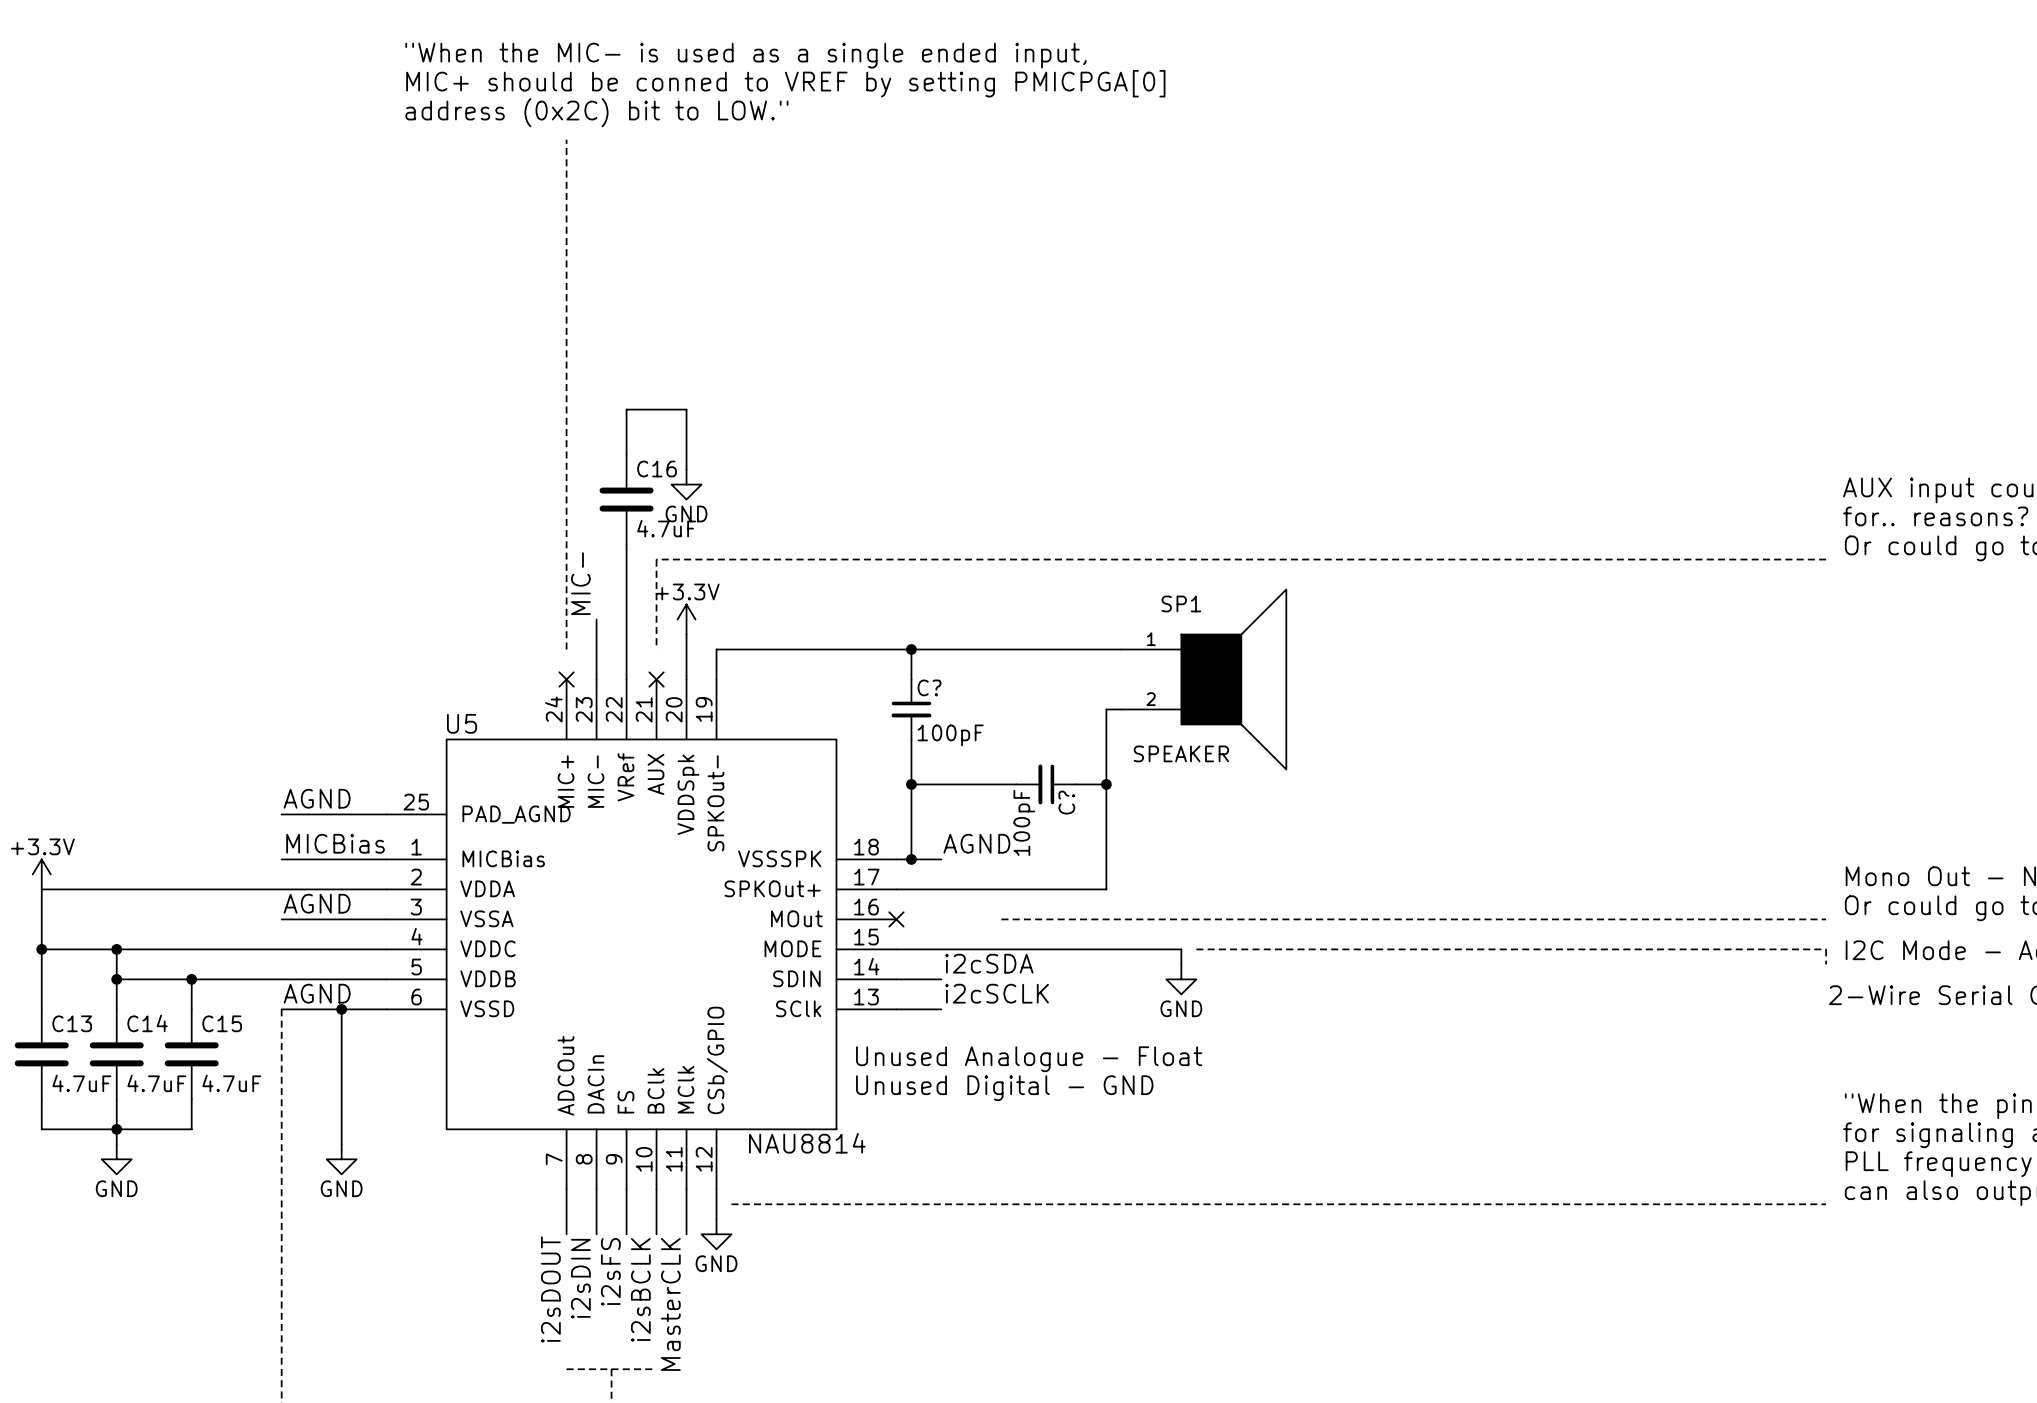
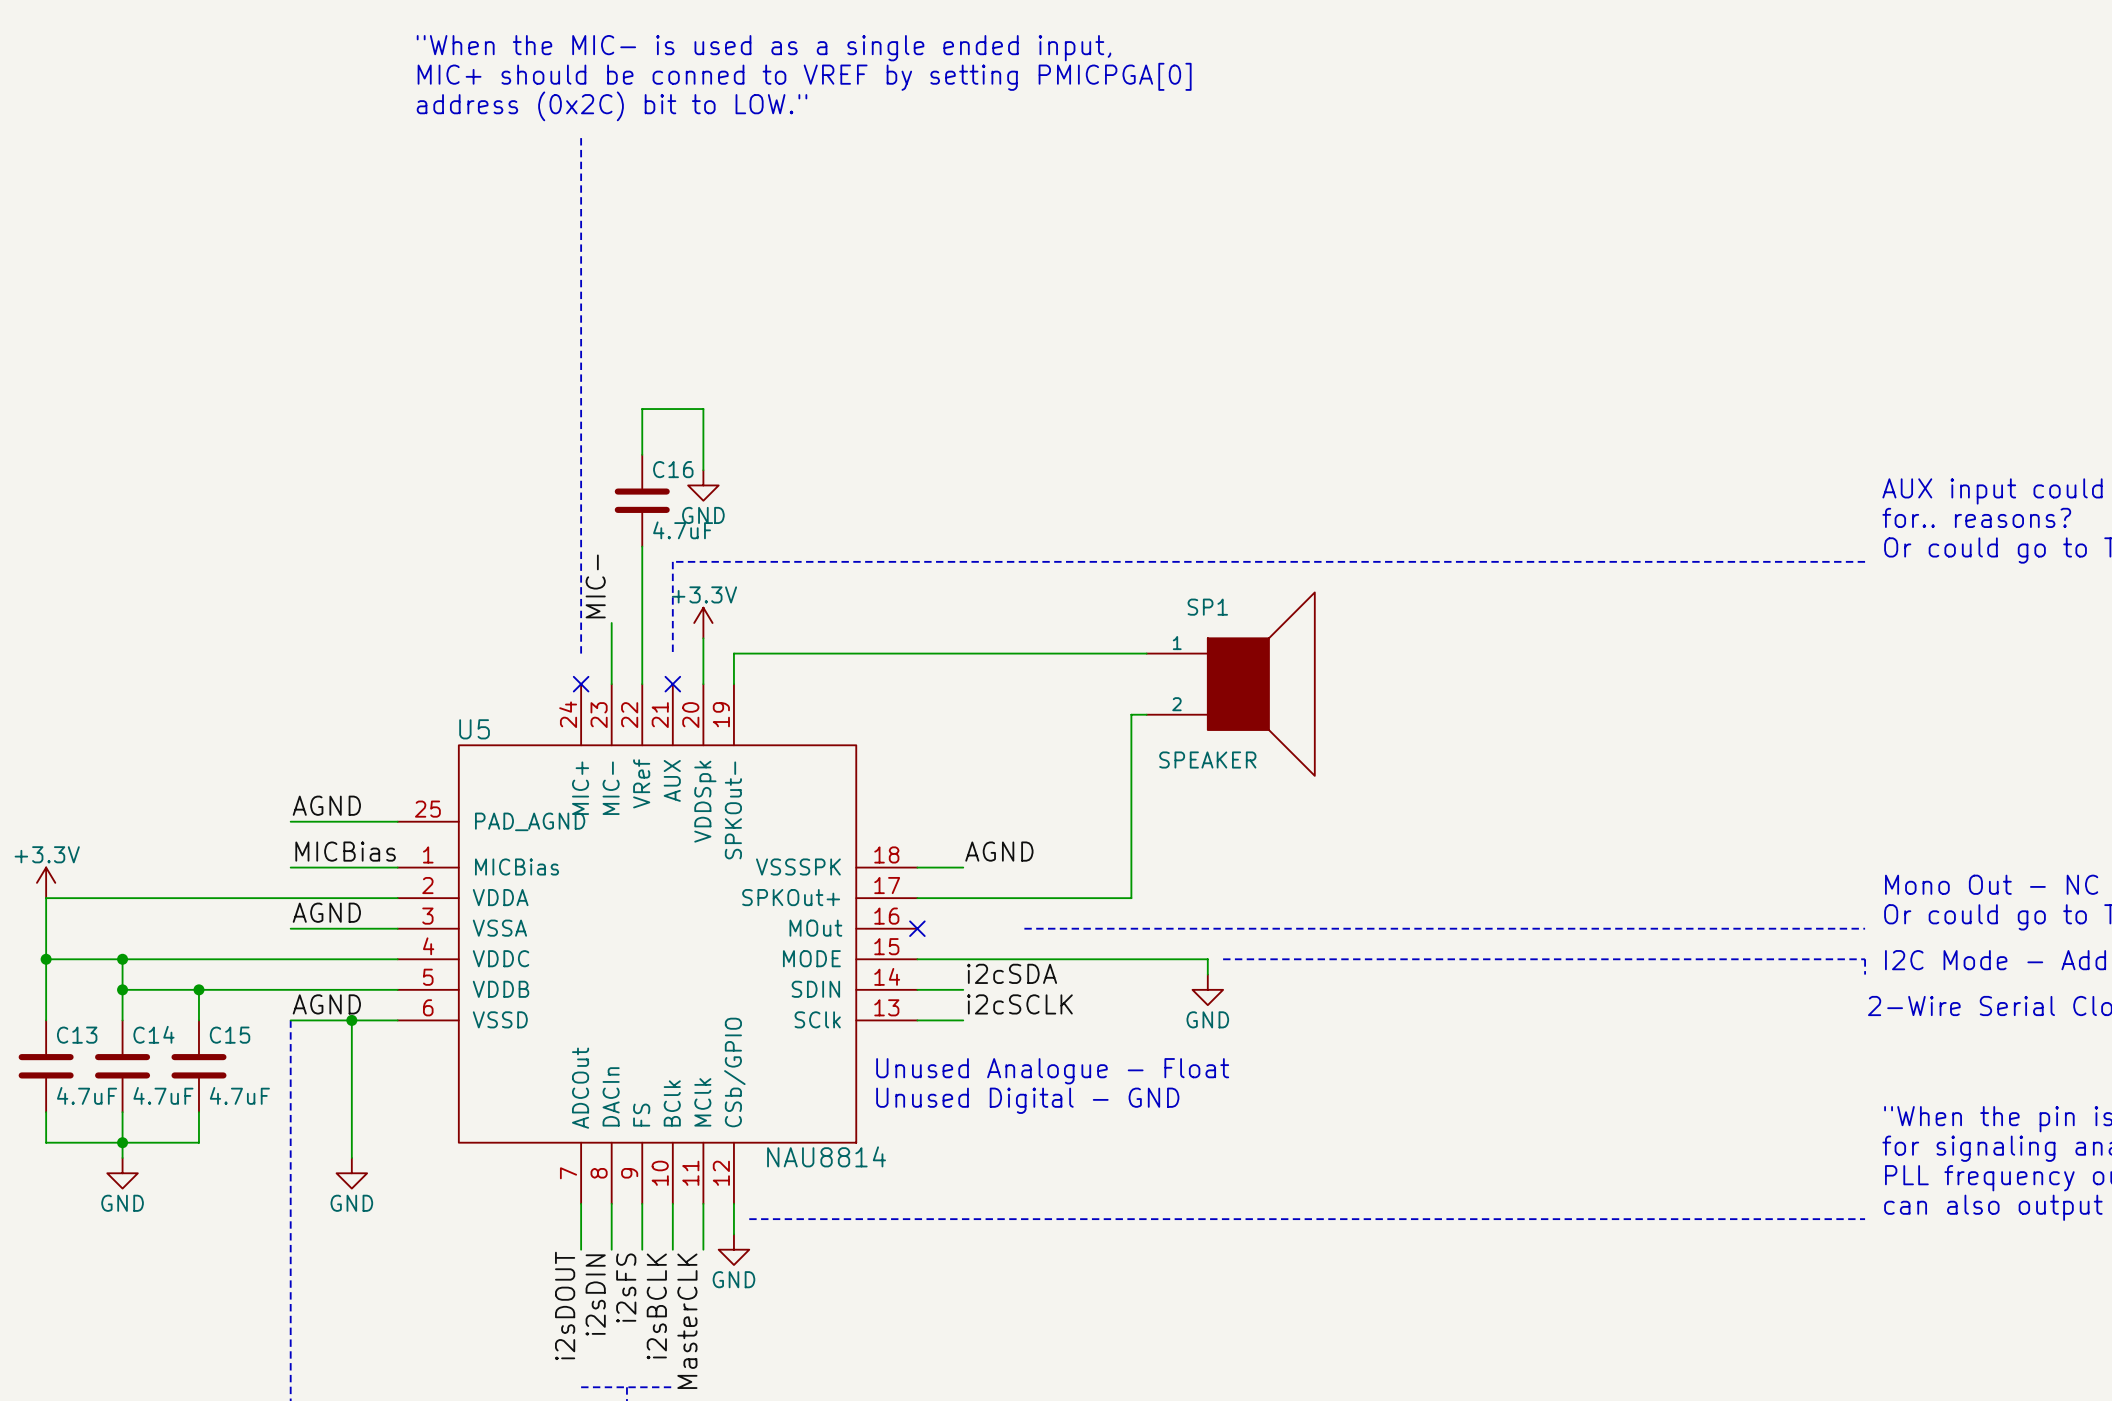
wire: (911, 649) (911, 679) -> none
junction: (911, 649) -> none
C?: 100pF (911, 709) -> none
wire: (911, 739) (911, 859) -> none
wire: (911, 784) (1016, 784) -> none
junction: (911, 784) -> none
C?: 100pF (1046, 784) -> none
wire: (1076, 784) (1106, 784) -> none
junction: (1106, 784) -> none
junction: (911, 859) -> none

